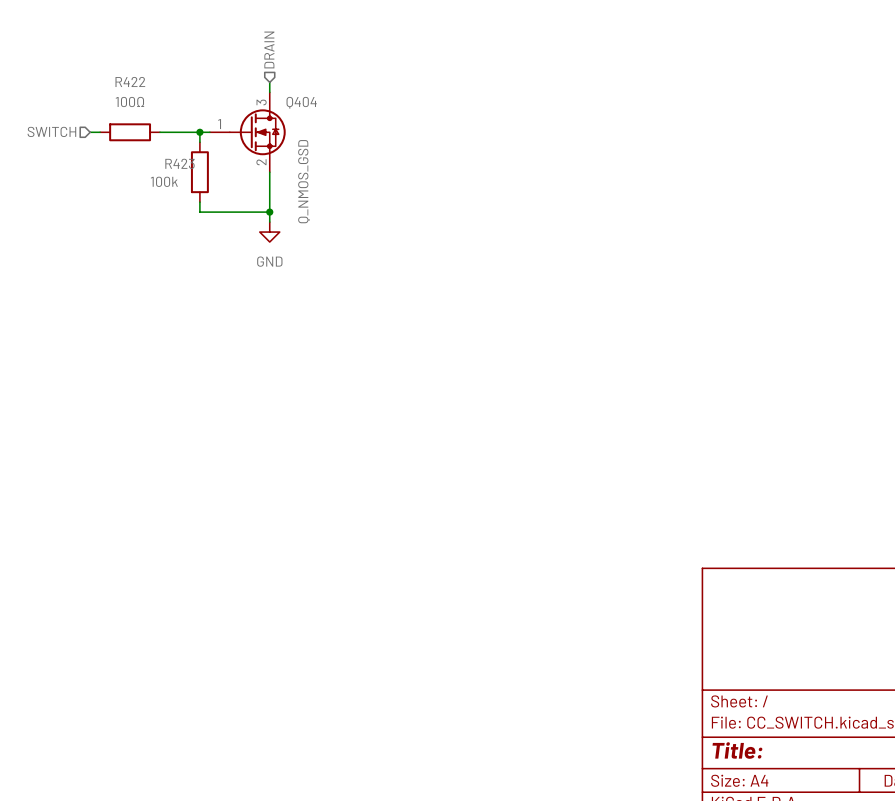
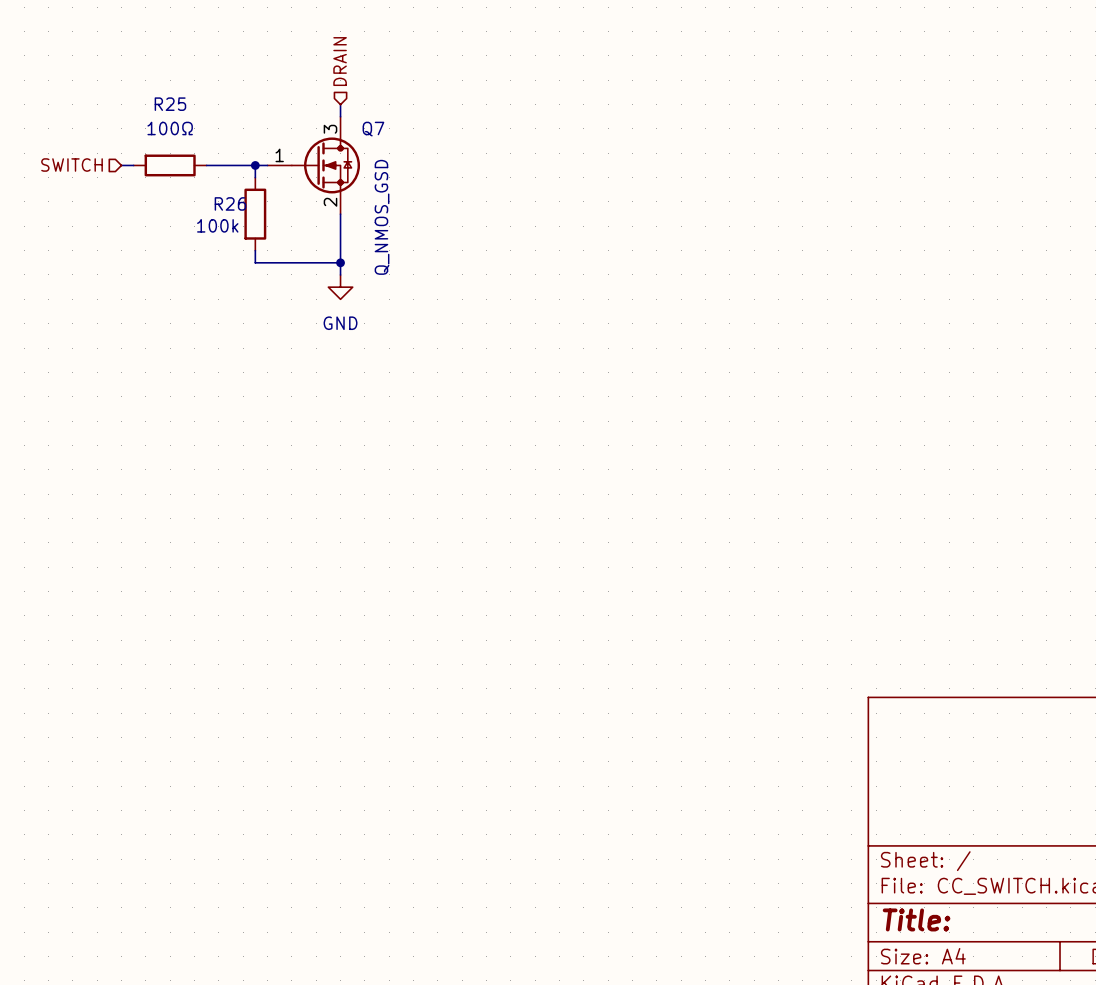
R422 name: R422 (130, 81) -> R25 (170, 104)
Q404 name: Q404 (301, 102) -> Q7 (373, 129)
R423 name: R423 (179, 163) -> R26 (230, 203)

